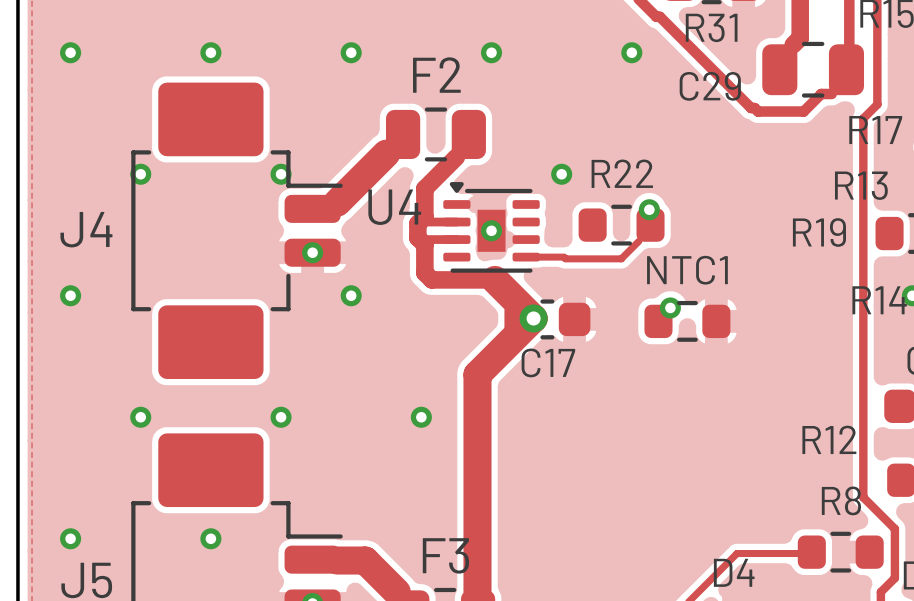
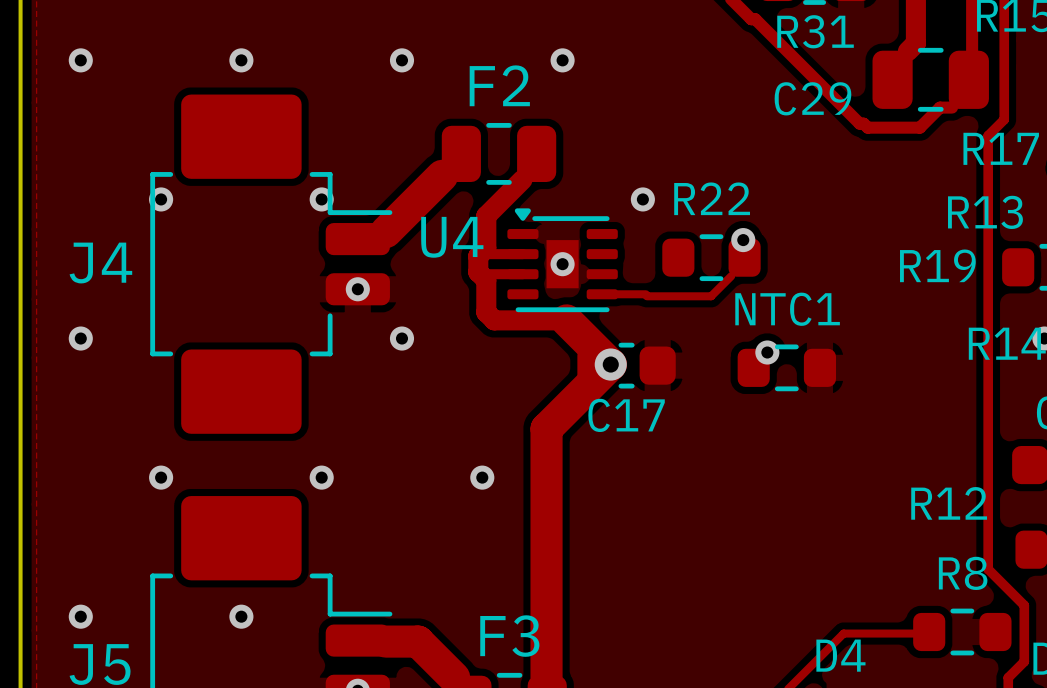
via: (631, 52) -> none

